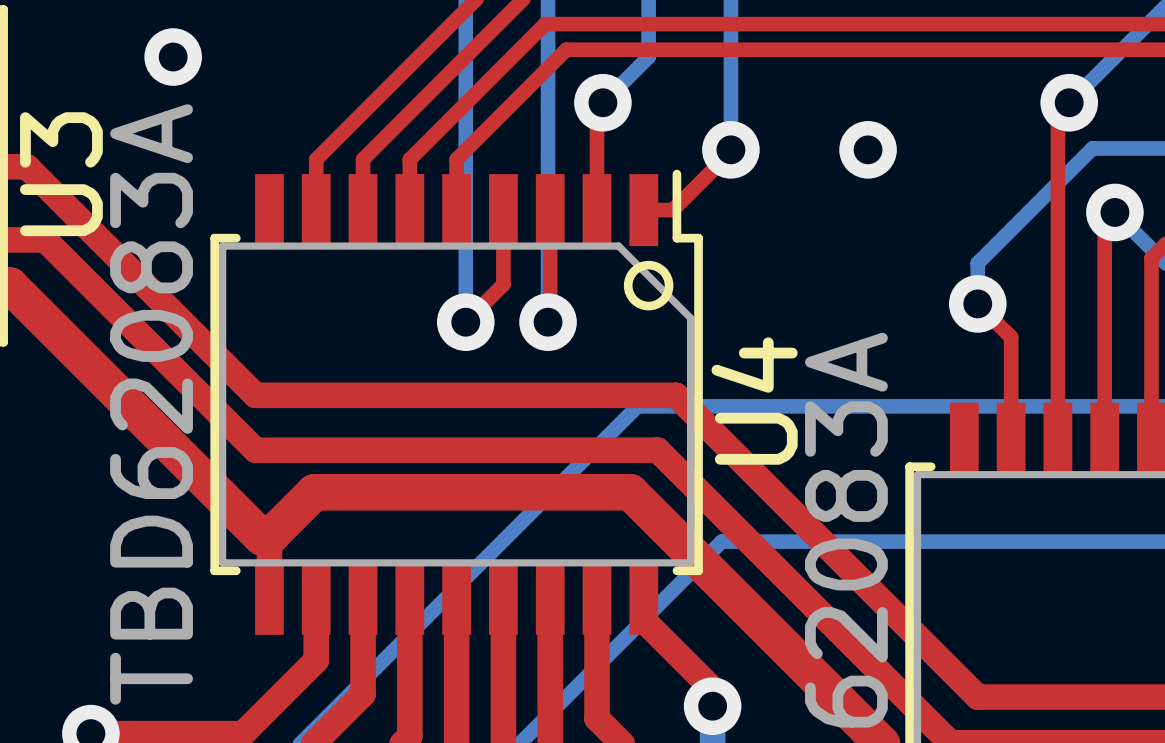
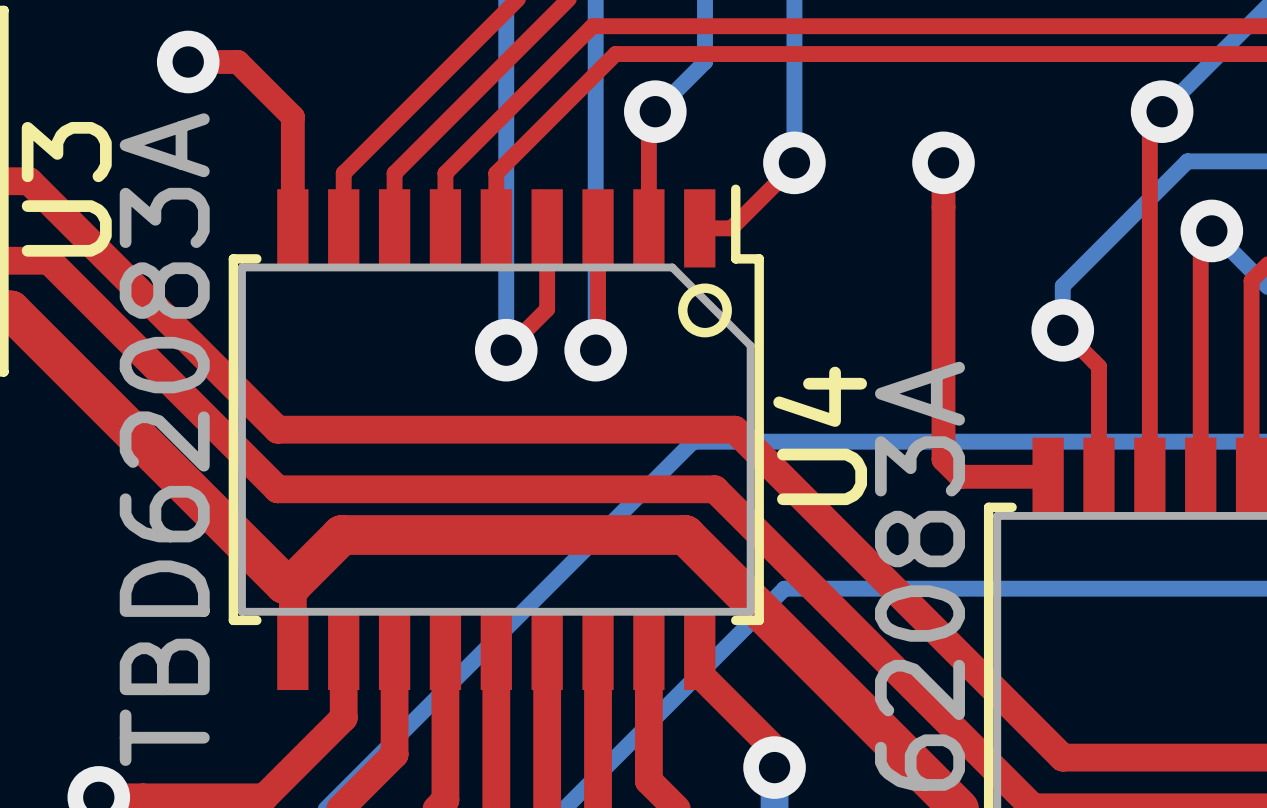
top track: none -> (188, 61) (237, 61) (292, 116) (292, 228)
top track: none -> (943, 162) (943, 459) (960, 476) (1048, 476)

